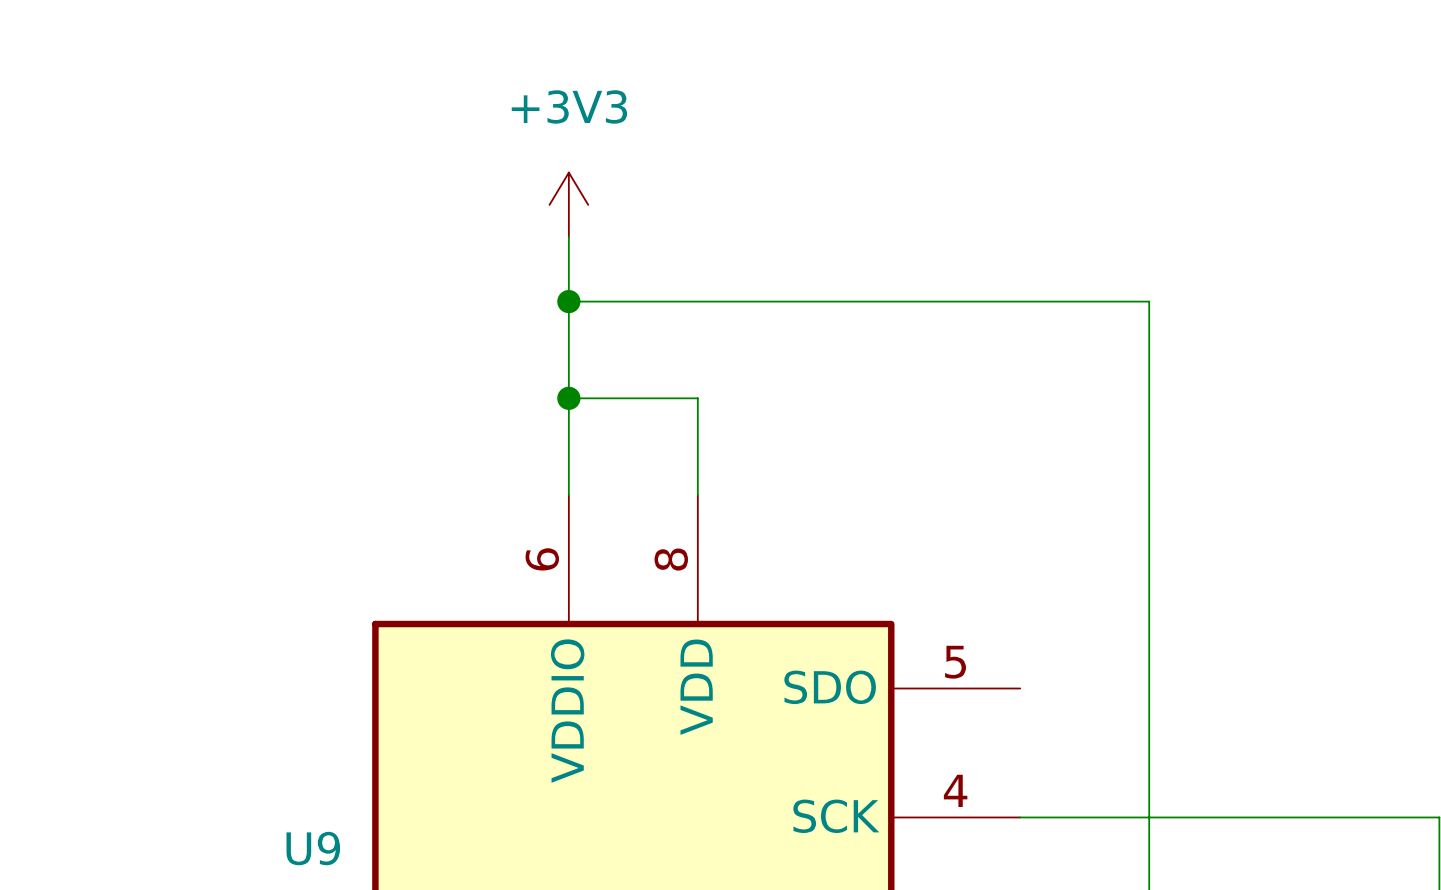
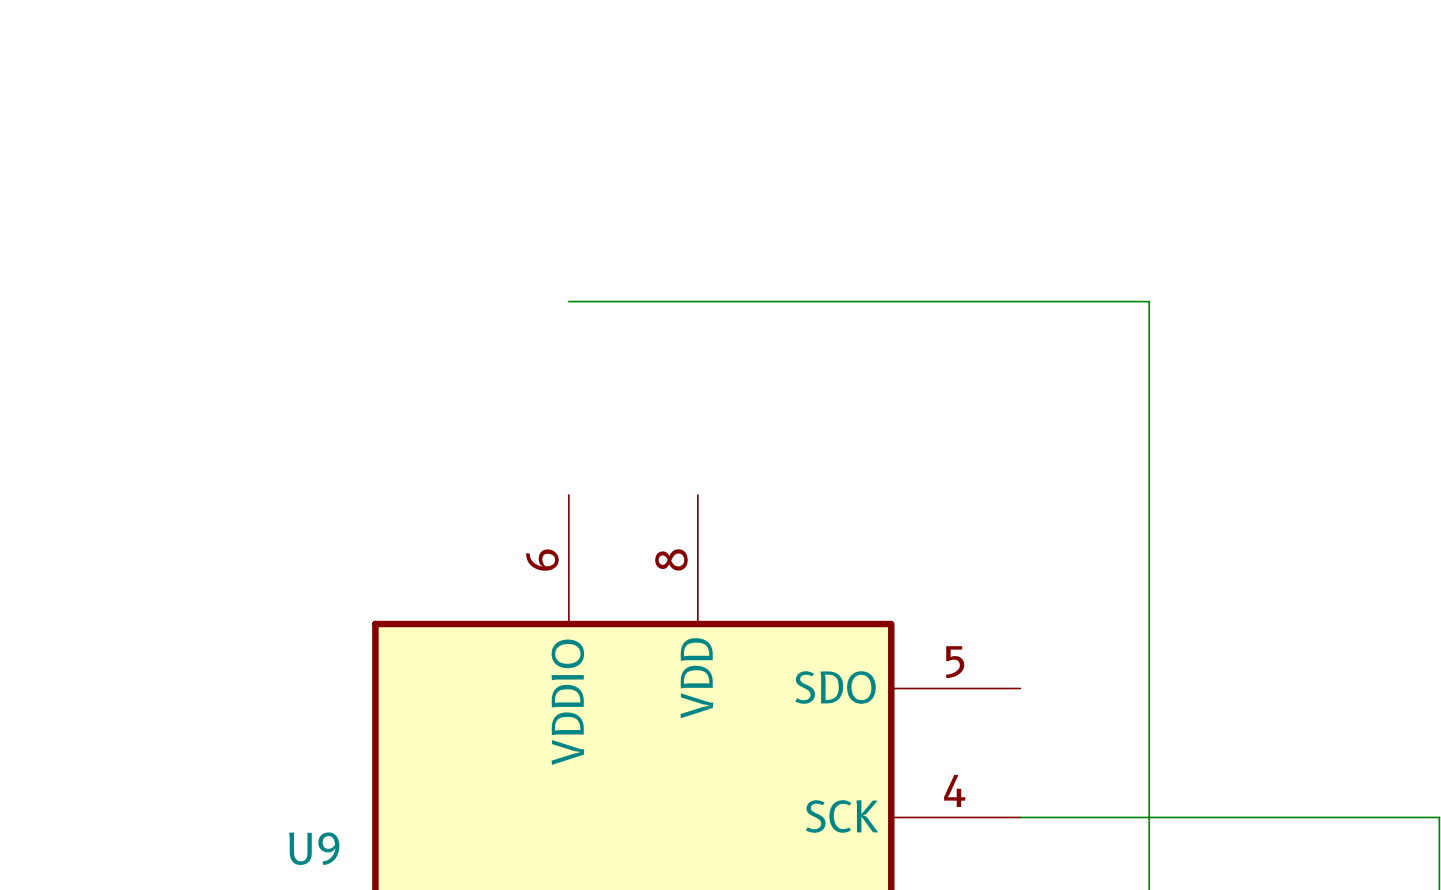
power symbol: +3V3 (568, 204) -> none
wire: (568, 237) (568, 495) -> none
junction: (568, 301) -> none
wire: (568, 398) (697, 398) (697, 495) -> none
junction: (568, 398) -> none

